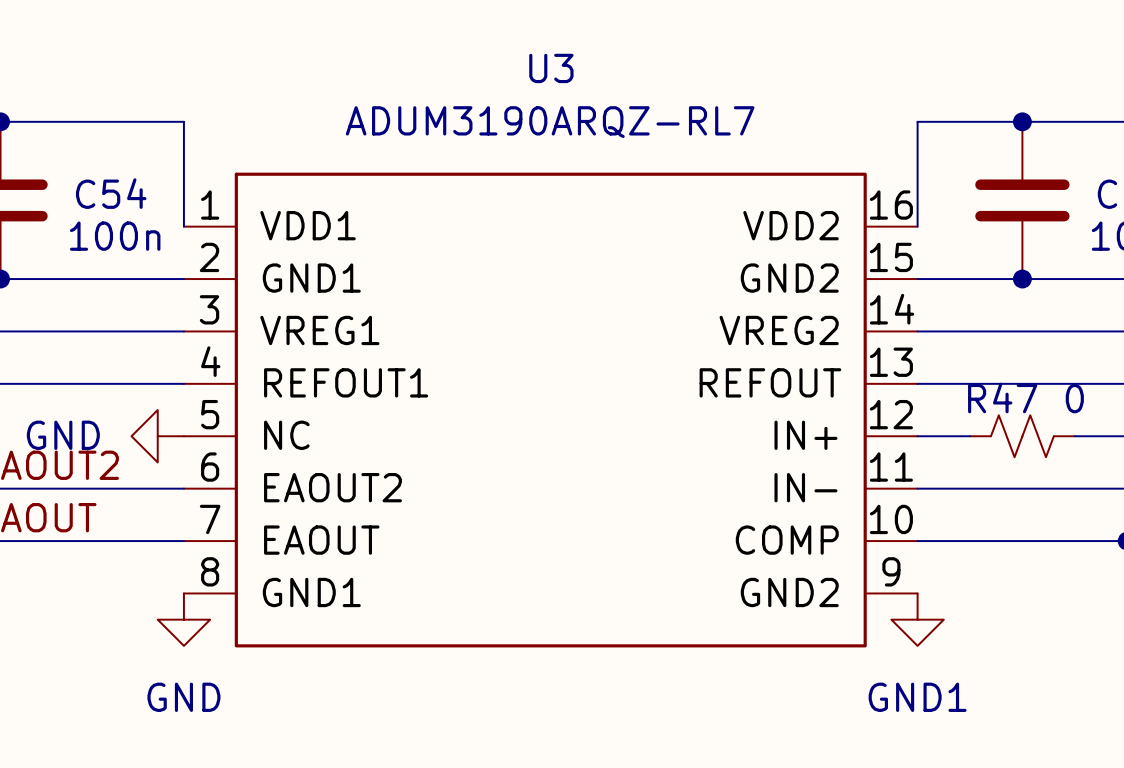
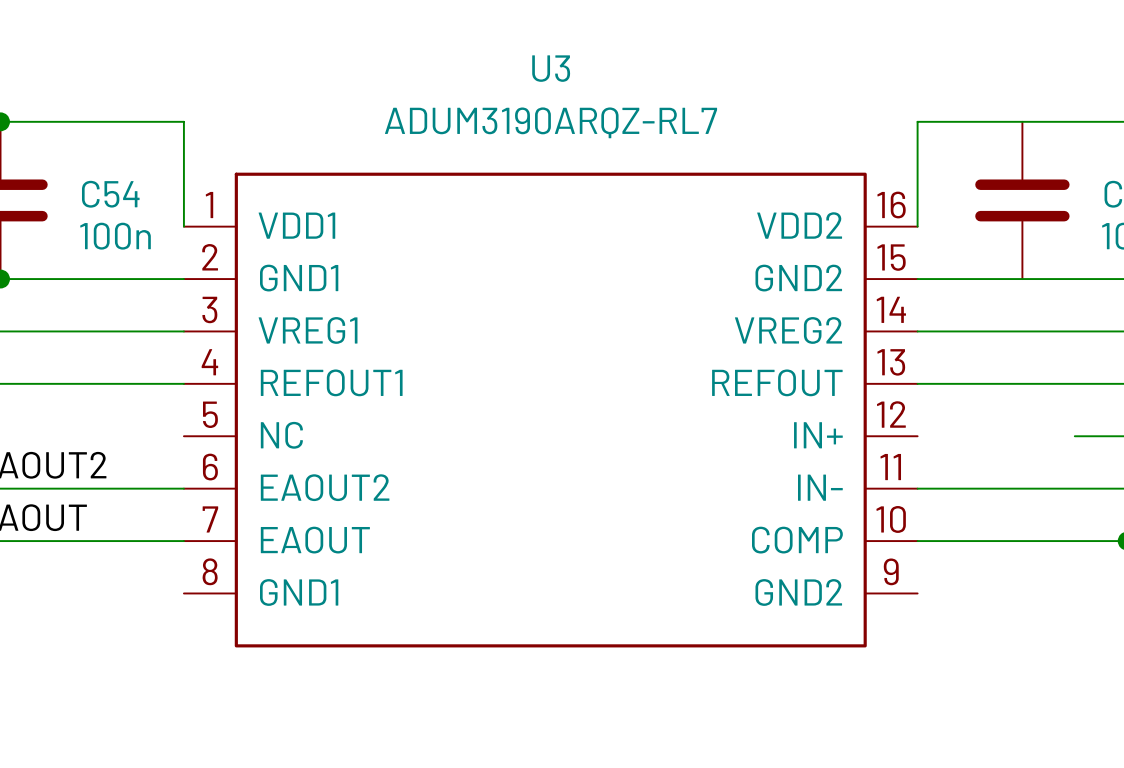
junction: (1022, 121) -> none
junction: (1022, 279) -> none
power symbol: GND (157, 436) -> none
wire: (917, 436) (970, 436) -> none
R47: 0 (1022, 436) -> none
power symbol: GND (183, 619) -> none
power symbol: GND1 (917, 619) -> none

